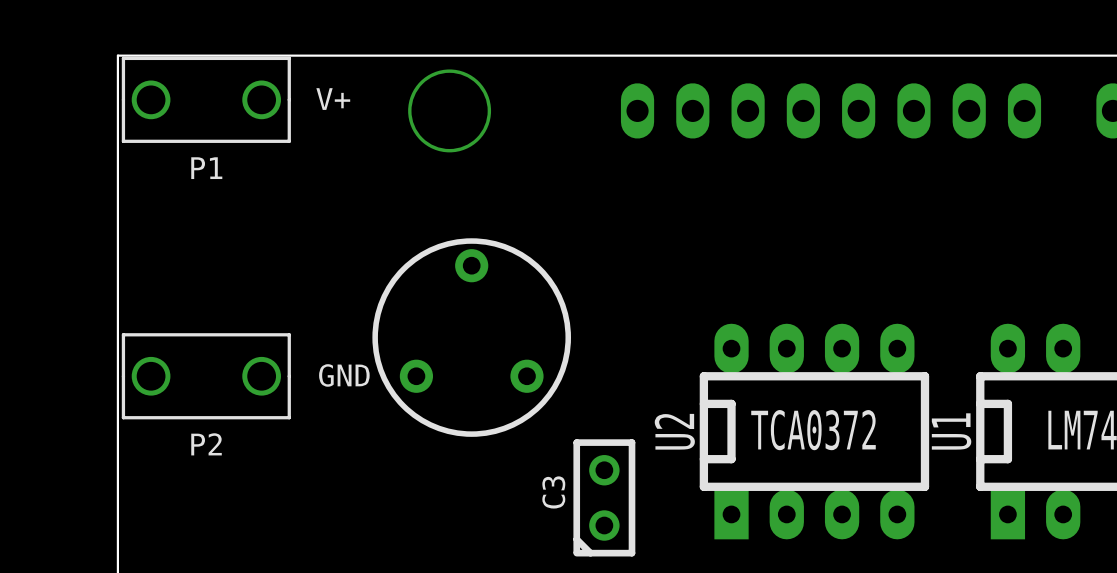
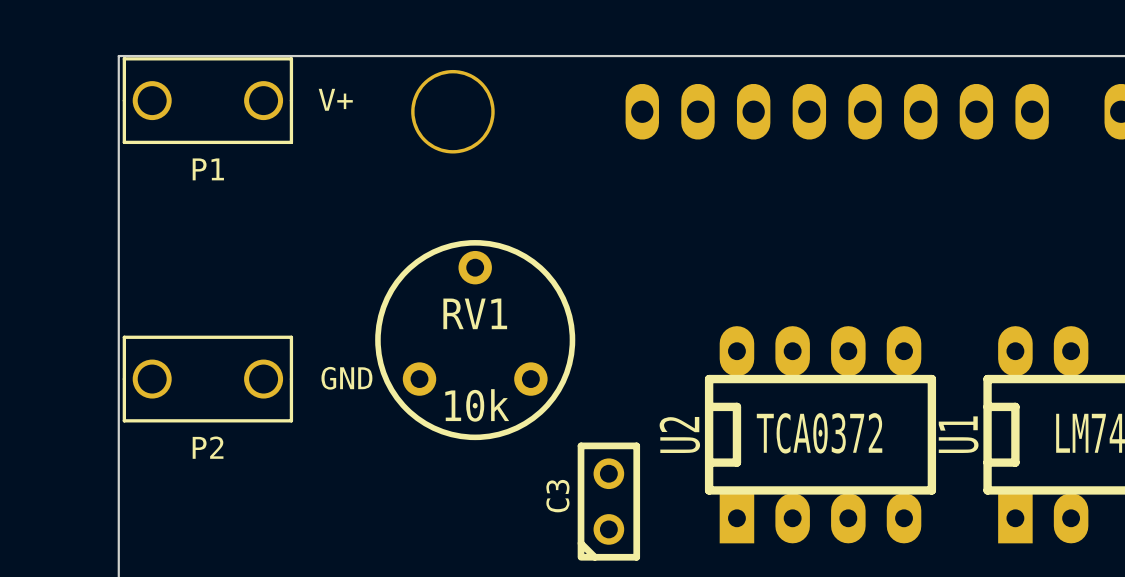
RV1 name: none -> RV1 (475, 313)
RV1 value: none -> 10k (477, 405)

